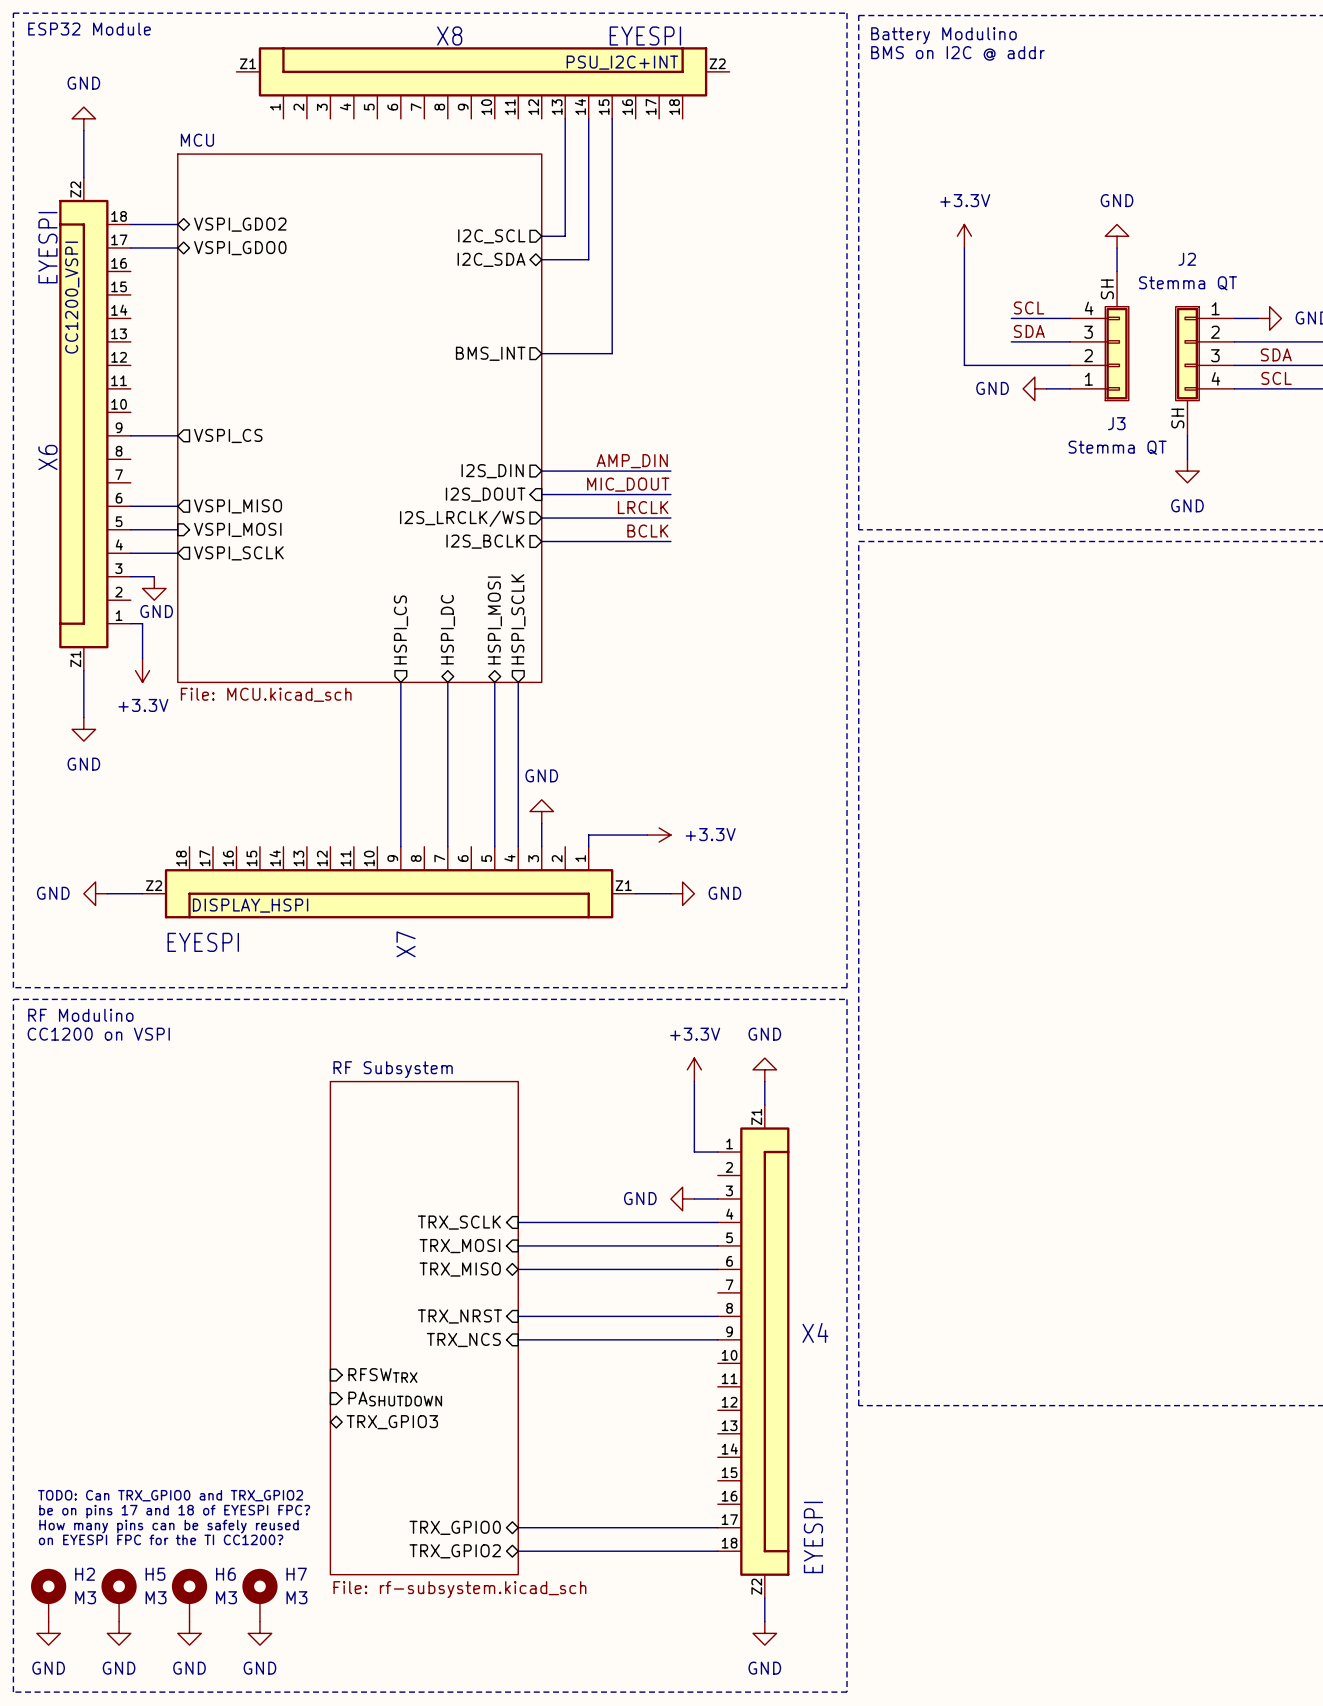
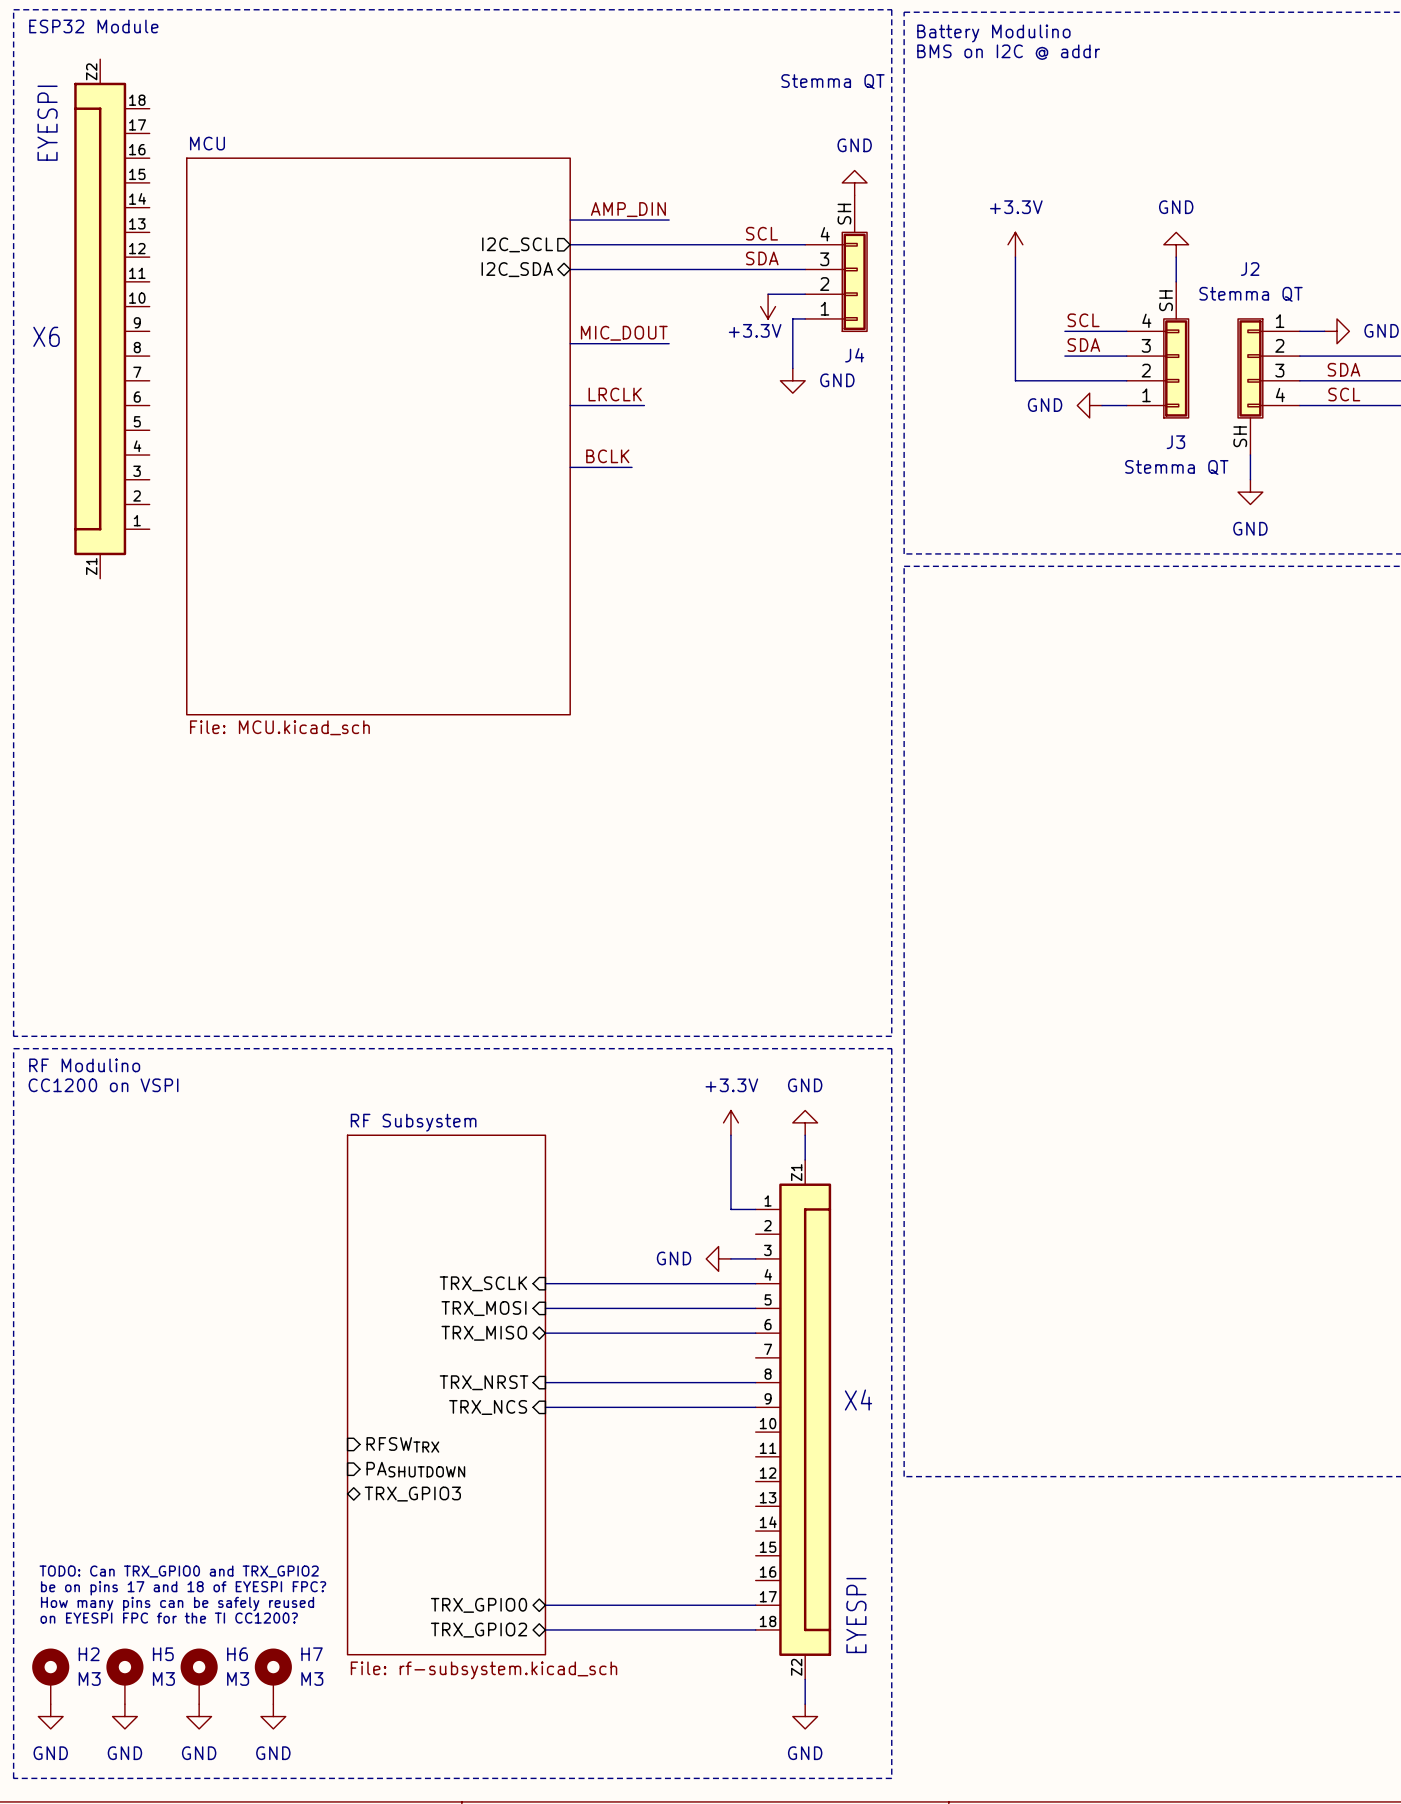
X8: EYESPI (483, 83) -> none
power symbol: GND (83, 118) -> none
wire: (565, 118) (565, 236) -> (805, 244) (594, 244)
wire: (588, 118) (588, 259) -> (805, 269) (619, 269)
wire: (612, 118) (612, 353) (541, 353) -> none
power symbol: none -> GND (854, 182)
label: none -> AMP_DIN (628, 209)
wire: none -> (570, 220) (669, 220)
wire: (130, 224) (177, 224) -> none
sheet pin: VSPI_GDO2 (240, 224) -> none
label: none -> SCL (761, 233)
X6 value position: EYESPI (47, 247) -> EYESPI (47, 123)
wire: (130, 247) (177, 247) -> none
sheet pin: VSPI_GDO0 (240, 248) -> none
label: none -> SDA (762, 258)
J4: none -> Stemma QT (836, 263)
wire: none -> (768, 294) (805, 294)
power symbol: none -> +3.3V (768, 306)
X6 text: CC1200_VSPI (72, 297) -> none
wire: none -> (805, 318) (792, 318) (792, 368)
wire: none -> (570, 343) (669, 343)
sheet pin: BMS_INT (490, 353) -> none
power symbol: none -> GND (792, 380)
wire: none -> (570, 405) (644, 405)
X6 position: (95, 424) -> (111, 318)
wire: (130, 435) (177, 435) -> none
sheet pin: VSPI_CS (228, 435) -> none
wire: none -> (570, 467) (632, 467)
X6 name rotation: 0° (47, 457) -> 90° clockwise (46, 336)
label: AMP_DIN (632, 461) -> none
sheet pin: I2S_DIN (492, 471) -> none
wire: (541, 471) (670, 471) -> none
label position: MIC_DOUT (628, 484) -> MIC_DOUT (624, 333)
sheet pin: I2S_DOUT (485, 494) -> none
wire: (541, 494) (670, 494) -> none
wire: (130, 506) (177, 506) -> none
sheet pin: VSPI_MISO (238, 506) -> none
label position: LRCLK (643, 507) -> LRCLK (615, 394)
sheet pin: I2S_LRCLK/WS (462, 518) -> none
wire: (541, 518) (670, 518) -> none
wire: (130, 529) (177, 529) -> none
sheet pin: VSPI_MOSI (237, 529) -> none
label position: BCLK (647, 531) -> BCLK (607, 456)
sheet pin: I2S_BCLK (485, 541) -> none
wire: (541, 541) (670, 541) -> none
wire: (130, 553) (177, 553) -> none
sheet pin: VSPI_SCLK (238, 553) -> none
wire: (130, 576) (154, 576) -> none
power symbol: GND (154, 588) -> none
sheet pin: HSPI_SCLK (518, 619) -> none
sheet pin: HSPI_MOSI (494, 620) -> none
wire: (130, 623) (142, 623) (142, 658) -> none
sheet pin: HSPI_CS (400, 629) -> none
sheet pin: HSPI_DC (447, 629) -> none
wire: (83, 670) (83, 717) -> none
power symbol: +3.3V (142, 670) -> none
wire: (400, 682) (400, 846) -> none
wire: (447, 682) (447, 846) -> none
wire: (494, 682) (494, 846) -> none
wire: (518, 682) (518, 846) -> none
power symbol: GND (83, 729) -> none
power symbol: GND (541, 811) -> none
wire: (541, 823) (541, 846) -> none
wire: (647, 835) (588, 835) (588, 846) -> none
power symbol: +3.3V (659, 835) -> none
X7: EYESPI (389, 882) -> none
power symbol: GND (95, 893) -> none
wire: (107, 893) (142, 893) -> none
wire: (635, 893) (670, 893) -> none
power symbol: GND (682, 893) -> none

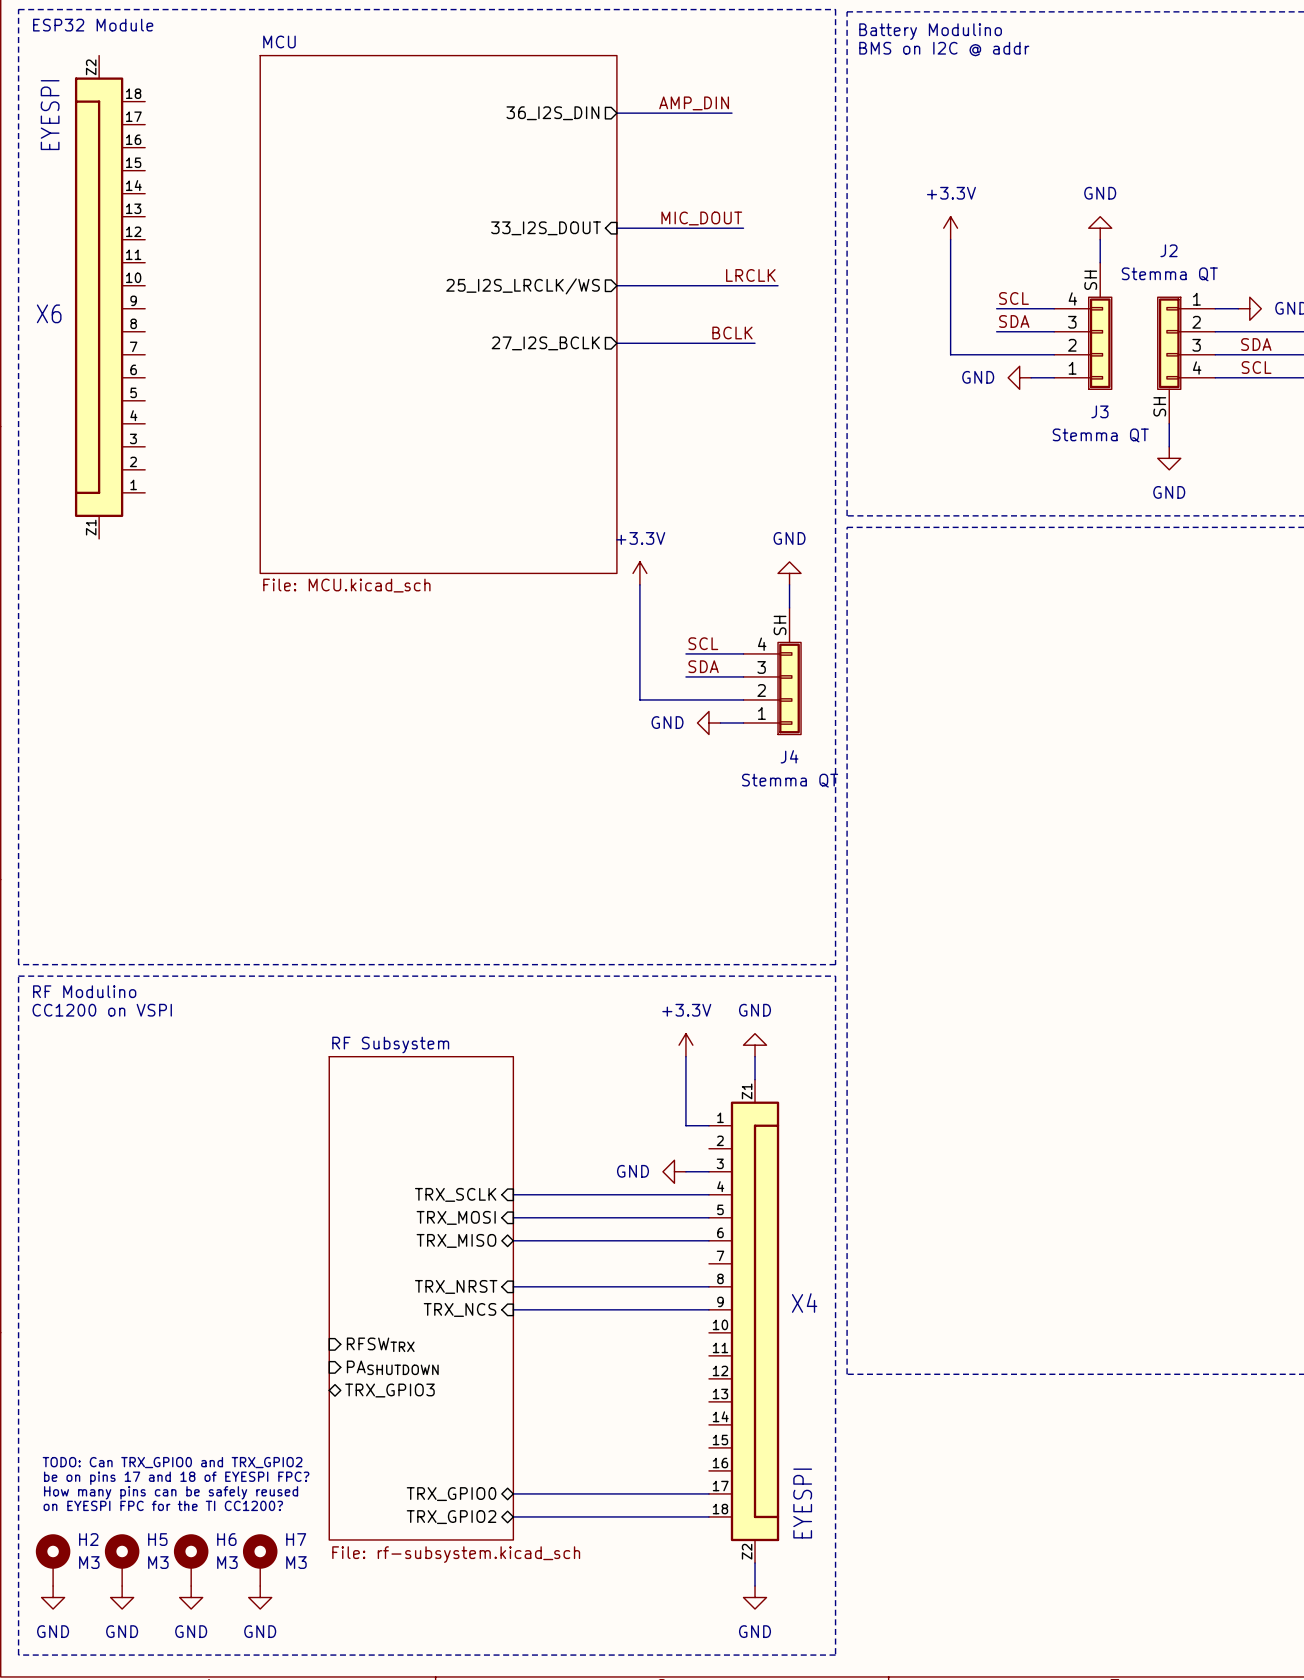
J4 value position: Stemma QT (832, 81) -> Stemma QT (790, 780)
sheet pin: none -> 36_I2S_DIN (552, 113)
wire: none -> (616, 113) (731, 113)
power symbol: GND (854, 182) -> none
label position: AMP_DIN (628, 209) -> AMP_DIN (694, 103)
wire: (570, 220) (669, 220) -> none
label: SCL (761, 233) -> none
sheet pin: I2C_SCL (517, 244) -> none
wire: (570, 244) (656, 244) -> none
sheet pin: none -> 33_I2S_DOUT (546, 228)
wire: (792, 244) (805, 244) -> none
label: SDA (762, 258) -> none
J4 position: (836, 263) -> (772, 671)
sheet pin: I2C_SDA (517, 269) -> none
wire: (570, 269) (805, 269) -> none
wire: (768, 294) (805, 294) -> none
wire: none -> (616, 285) (778, 285)
power symbol: +3.3V (768, 306) -> none
sheet pin: none -> 25_I2S_LRCLK/WS (523, 286)
wire: (805, 318) (792, 318) (792, 368) -> none
label position: MIC_DOUT (624, 333) -> MIC_DOUT (701, 218)
wire: (570, 343) (669, 343) -> none
sheet pin: none -> 27_I2S_BCLK (545, 343)
wire: none -> (616, 343) (755, 343)
power symbol: GND (792, 380) -> none
label position: LRCLK (615, 394) -> LRCLK (750, 275)
wire: (570, 405) (644, 405) -> none
sheet MCU position: (378, 436) -> (438, 314)
label position: BCLK (607, 456) -> BCLK (732, 333)
wire: (570, 467) (632, 467) -> none
power symbol: none -> +3.3V (639, 573)
power symbol: none -> GND (789, 573)
wire: none -> (639, 584) (639, 699) (743, 699)
wire: none -> (789, 584) (789, 607)
label: none -> SCL (703, 643)
wire: none -> (685, 653) (743, 653)
label: none -> SDA (703, 666)
wire: none -> (685, 676) (743, 676)
power symbol: none -> GND (708, 722)
wire: none -> (720, 722) (743, 722)

